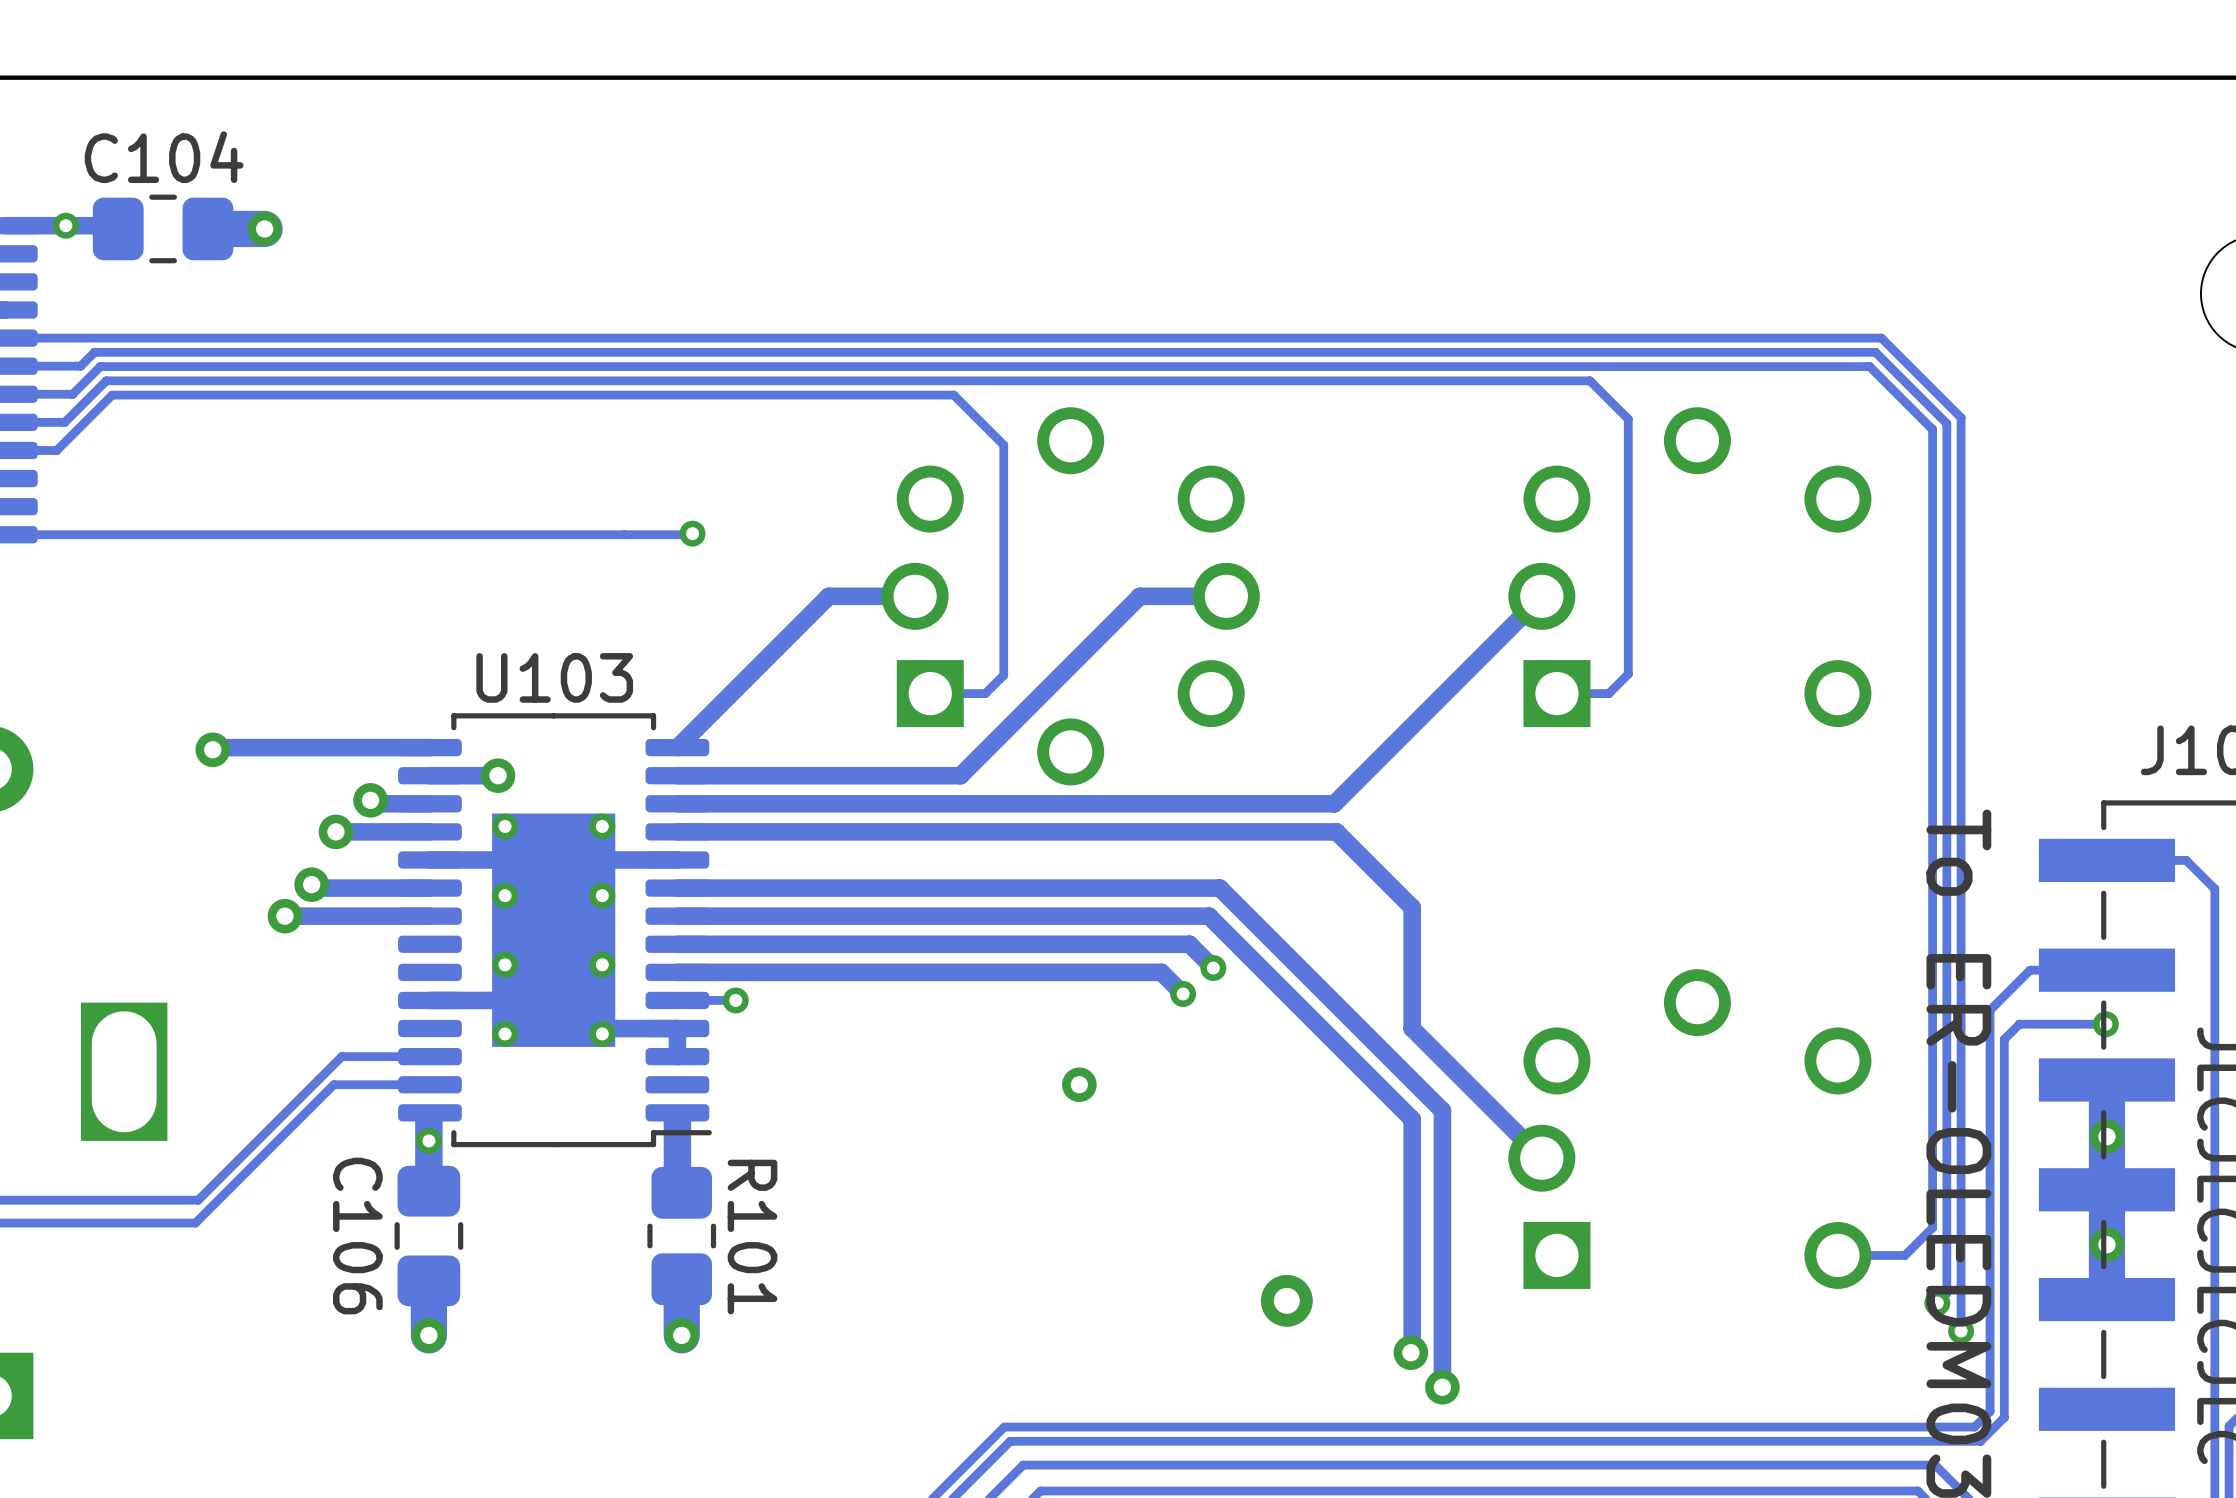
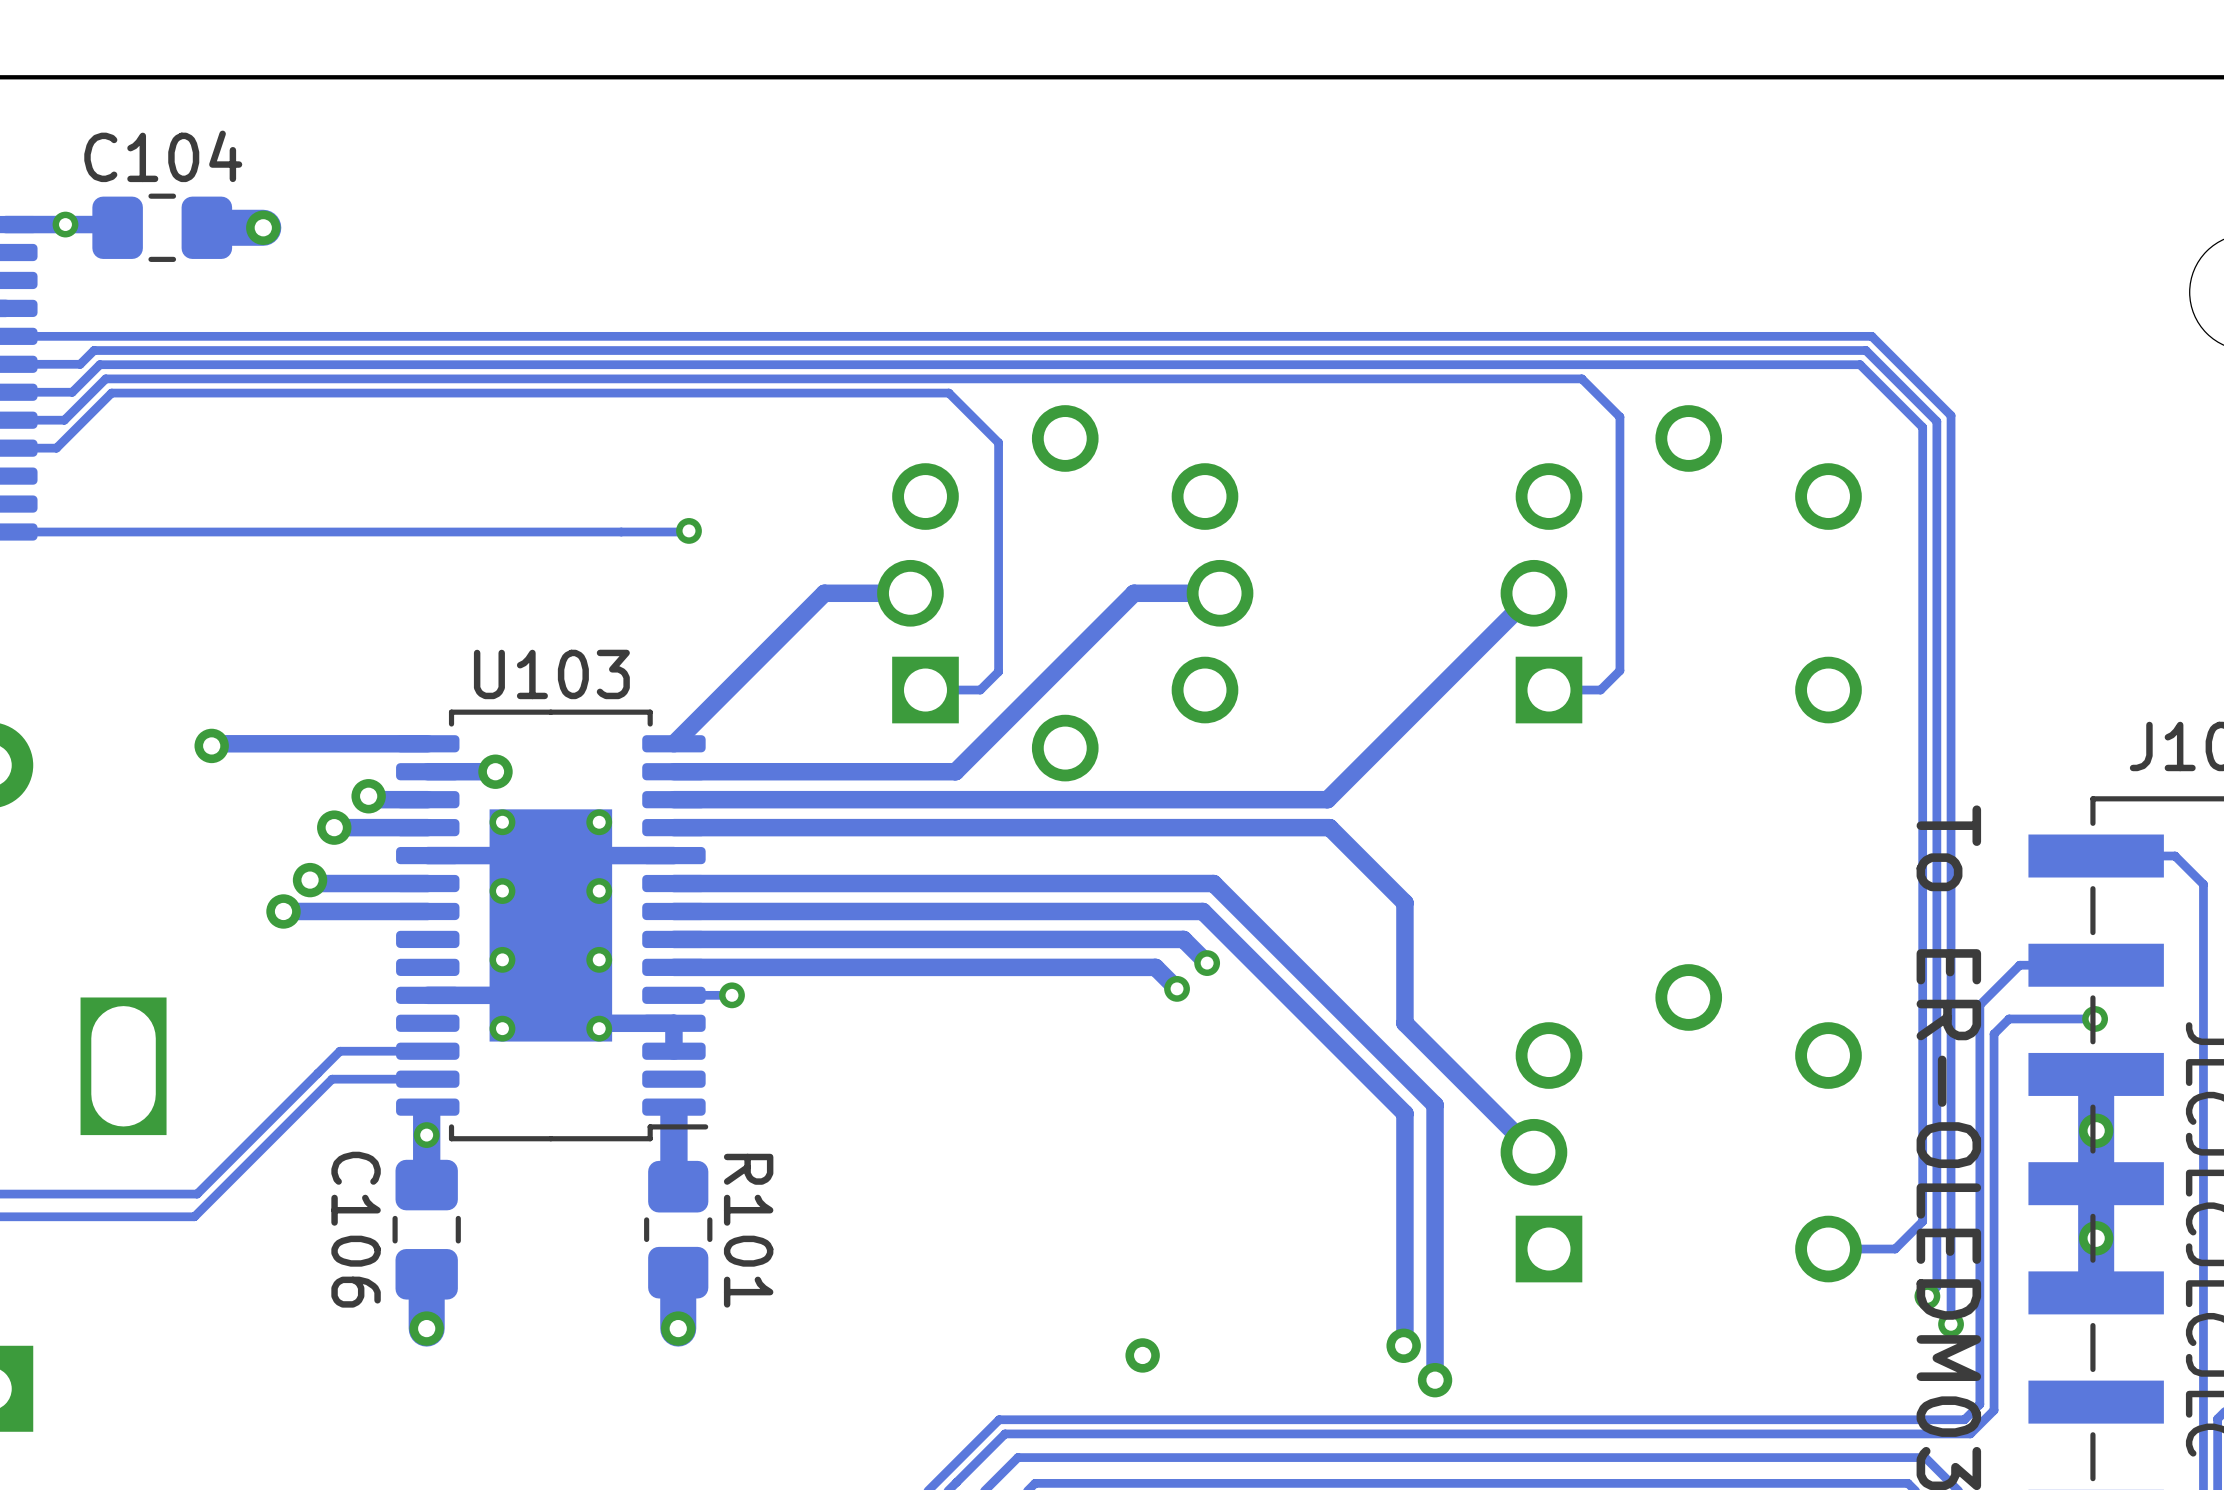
via: (1079, 1084) -> none
via: (1286, 1300) -> none
via: none -> (1142, 1355)

